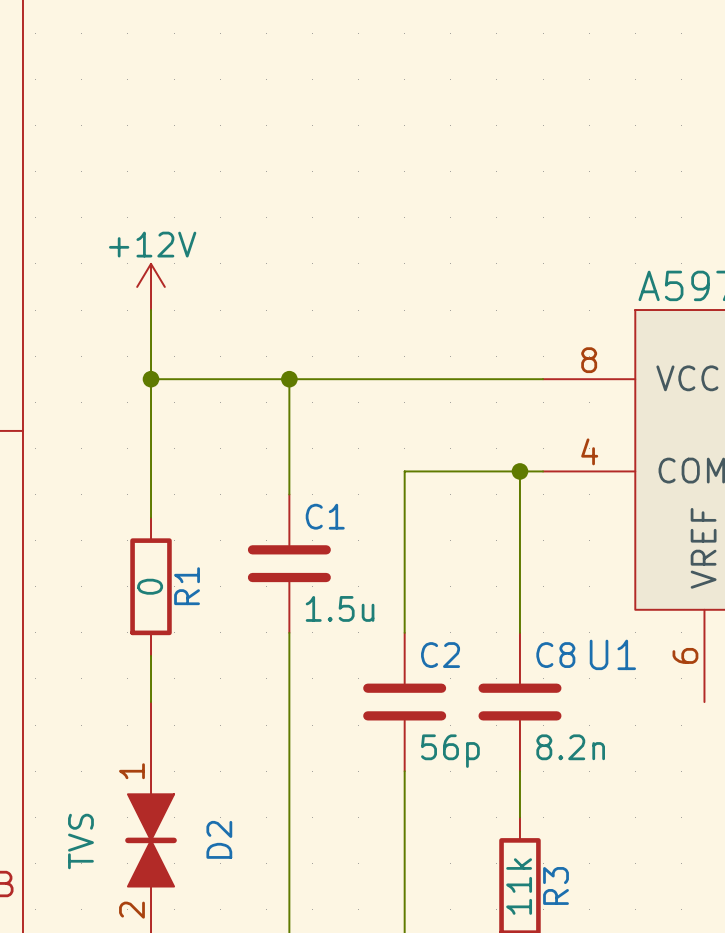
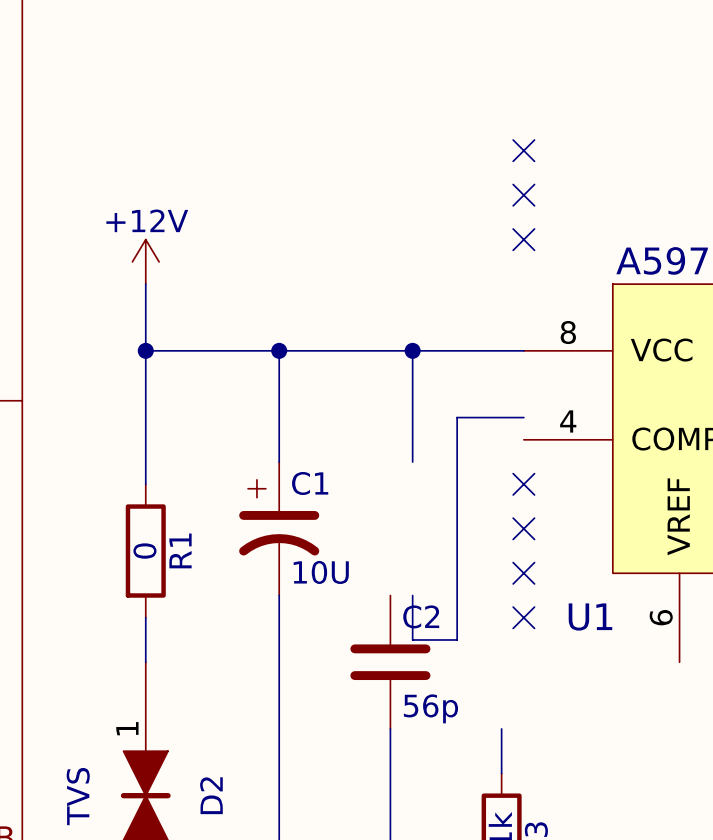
no-connect mark: none -> (523, 150)
no-connect mark: none -> (523, 195)
no-connect mark: none -> (523, 239)
wire: none -> (412, 350) (412, 462)
junction: none -> (412, 350)
wire: none -> (523, 417) (457, 417) (457, 639) (412, 639) (412, 595)
wire: (519, 471) (519, 632) -> none
junction: (519, 471) -> none
wire: (543, 471) (404, 471) (404, 632) -> none
C1 symbol: [247, 494, 331, 633] -> [239, 462, 320, 596]
no-connect mark: none -> (523, 484)
no-connect mark: none -> (523, 528)
C1 value: 1.5u (340, 608) -> 10U (321, 572)
no-connect mark: none -> (523, 573)
no-connect mark: none -> (523, 617)
C8: 8.2n (519, 702) -> none

